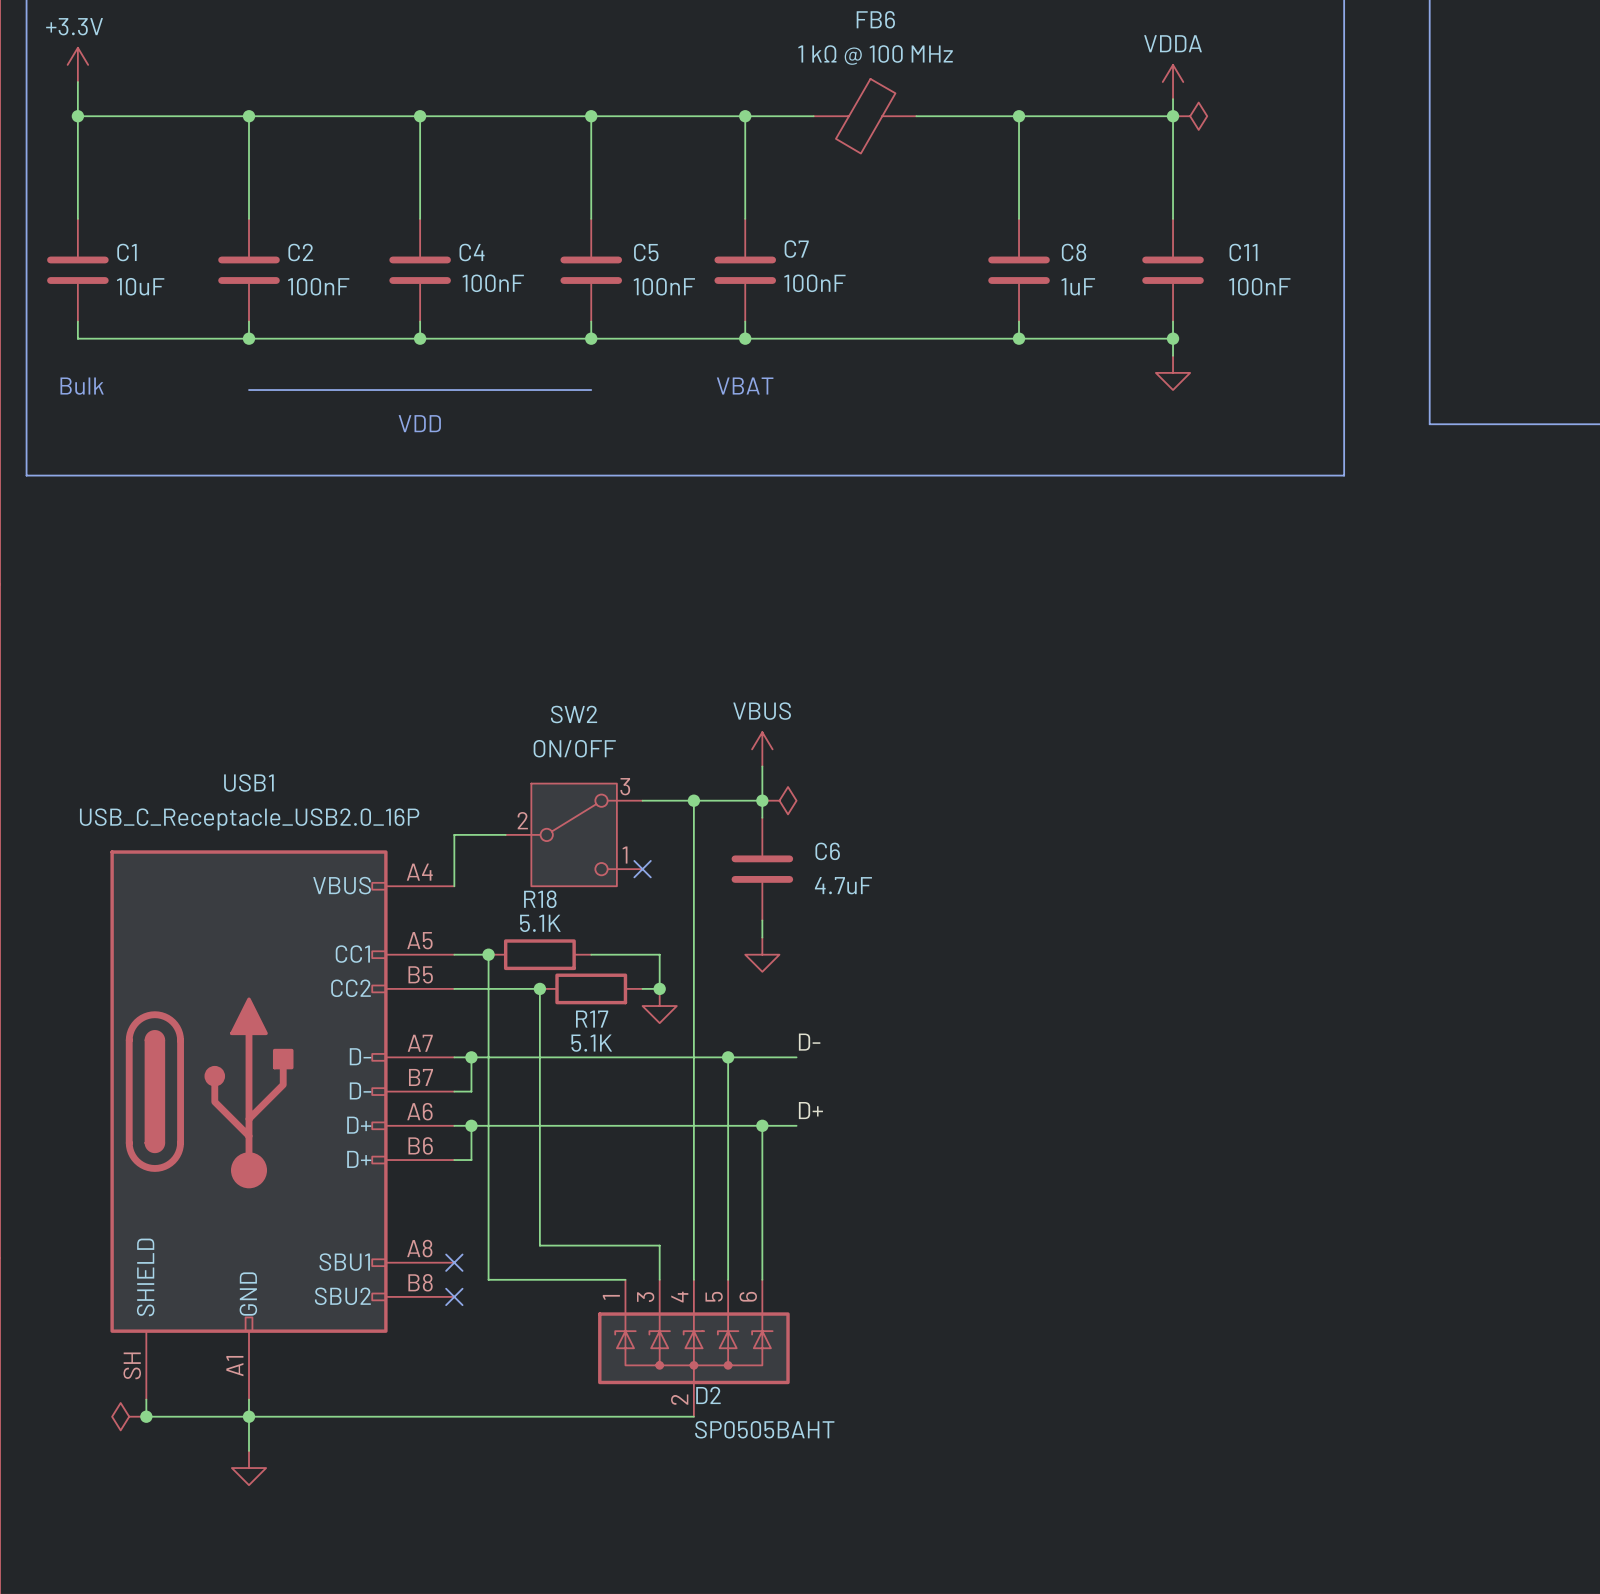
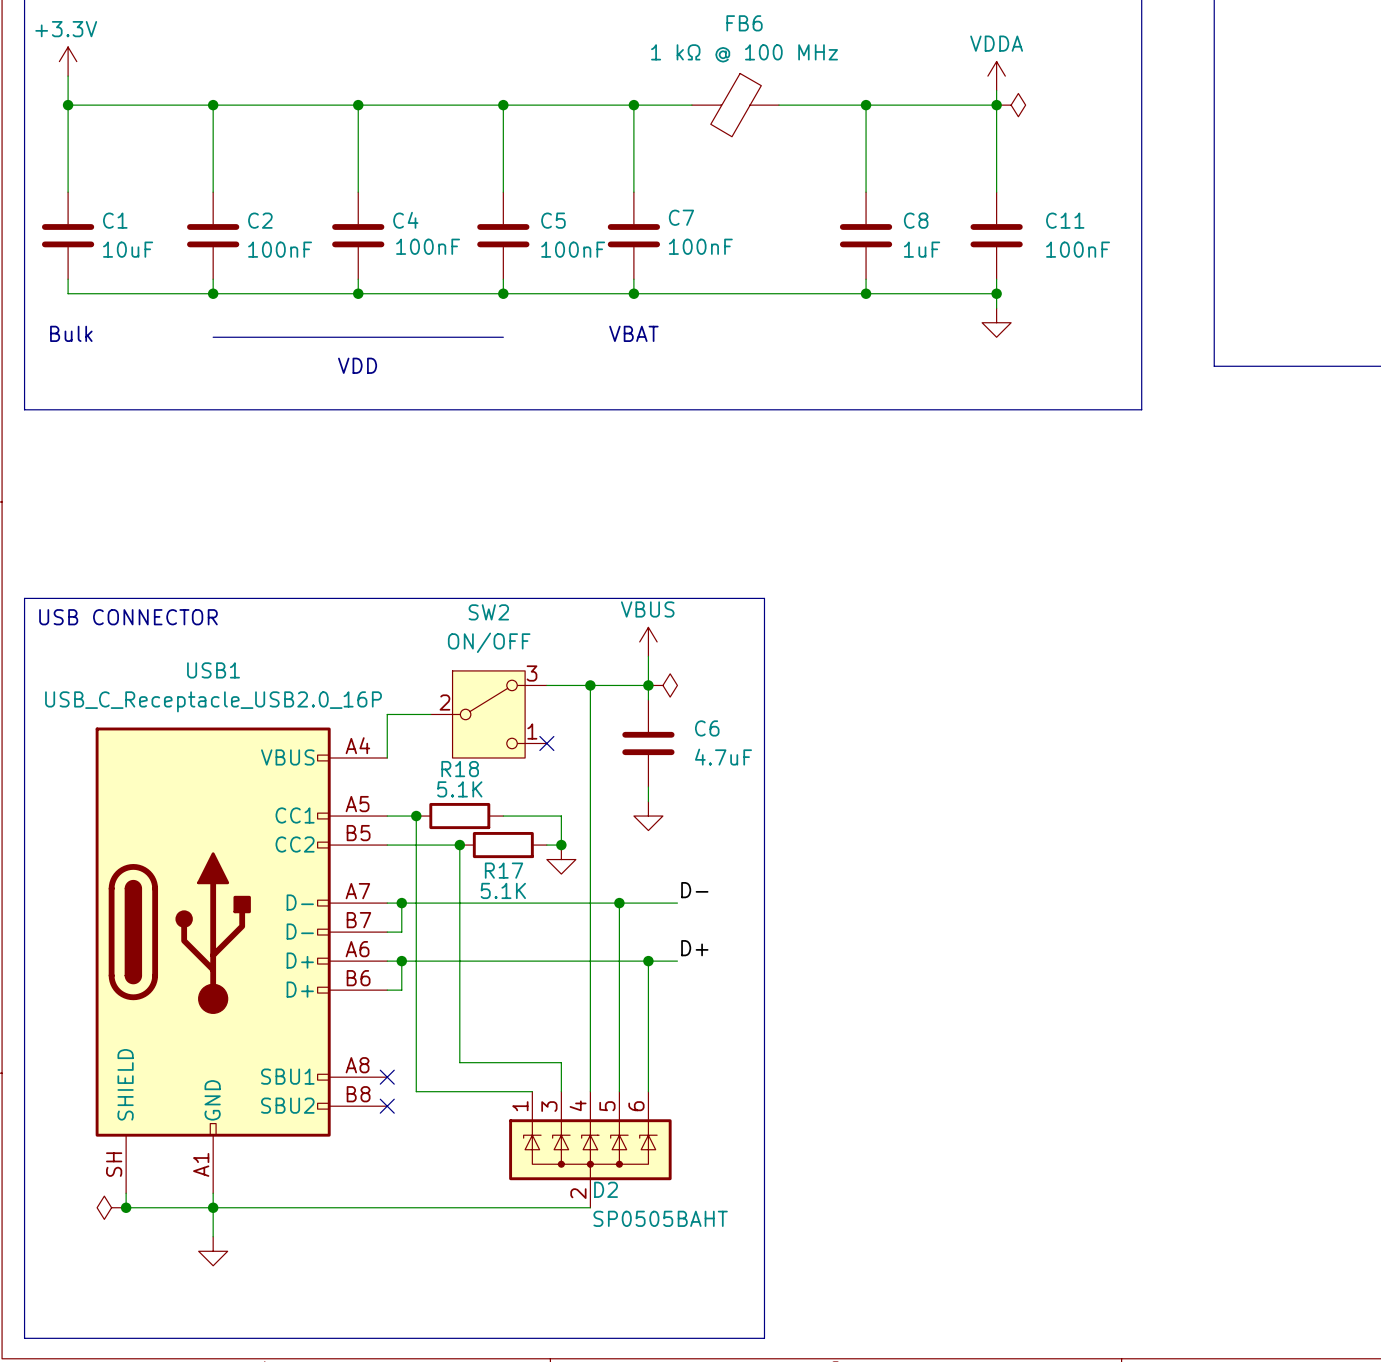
line: none -> (24, 598) (764, 598) (764, 1338) (24, 1338) (24, 598)
text: none -> USB CONNECTOR (128, 617)

